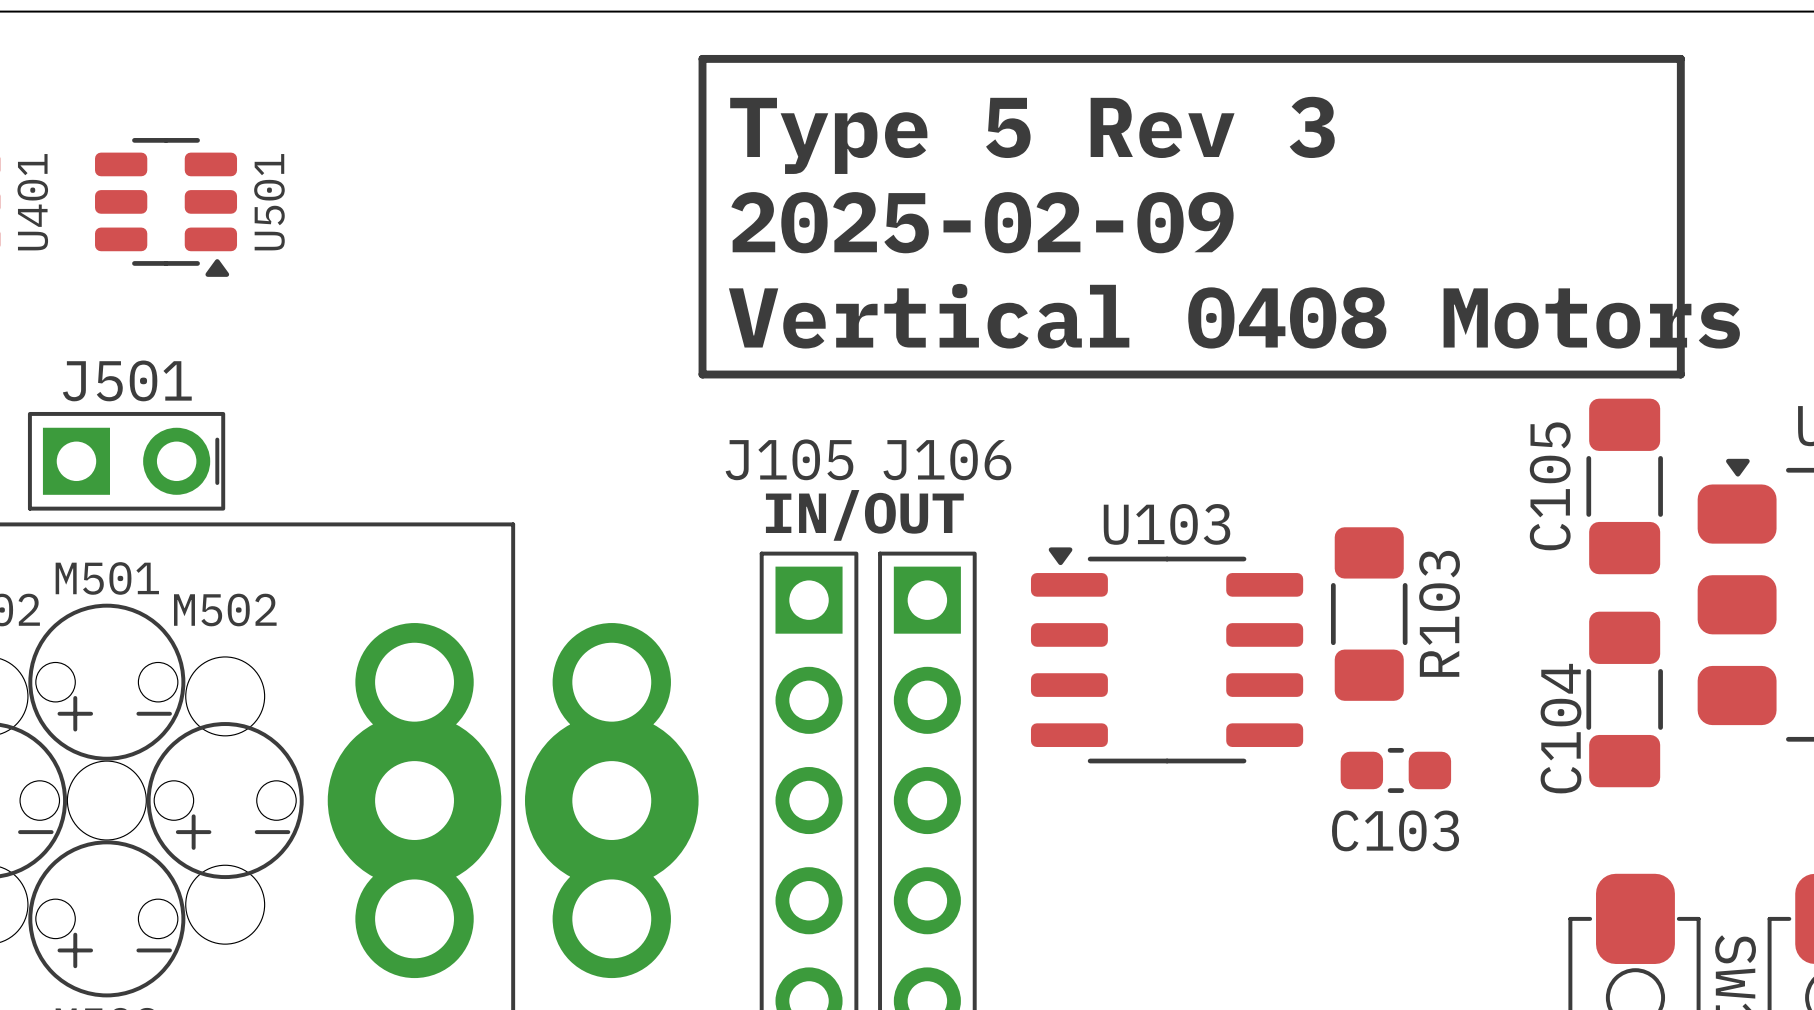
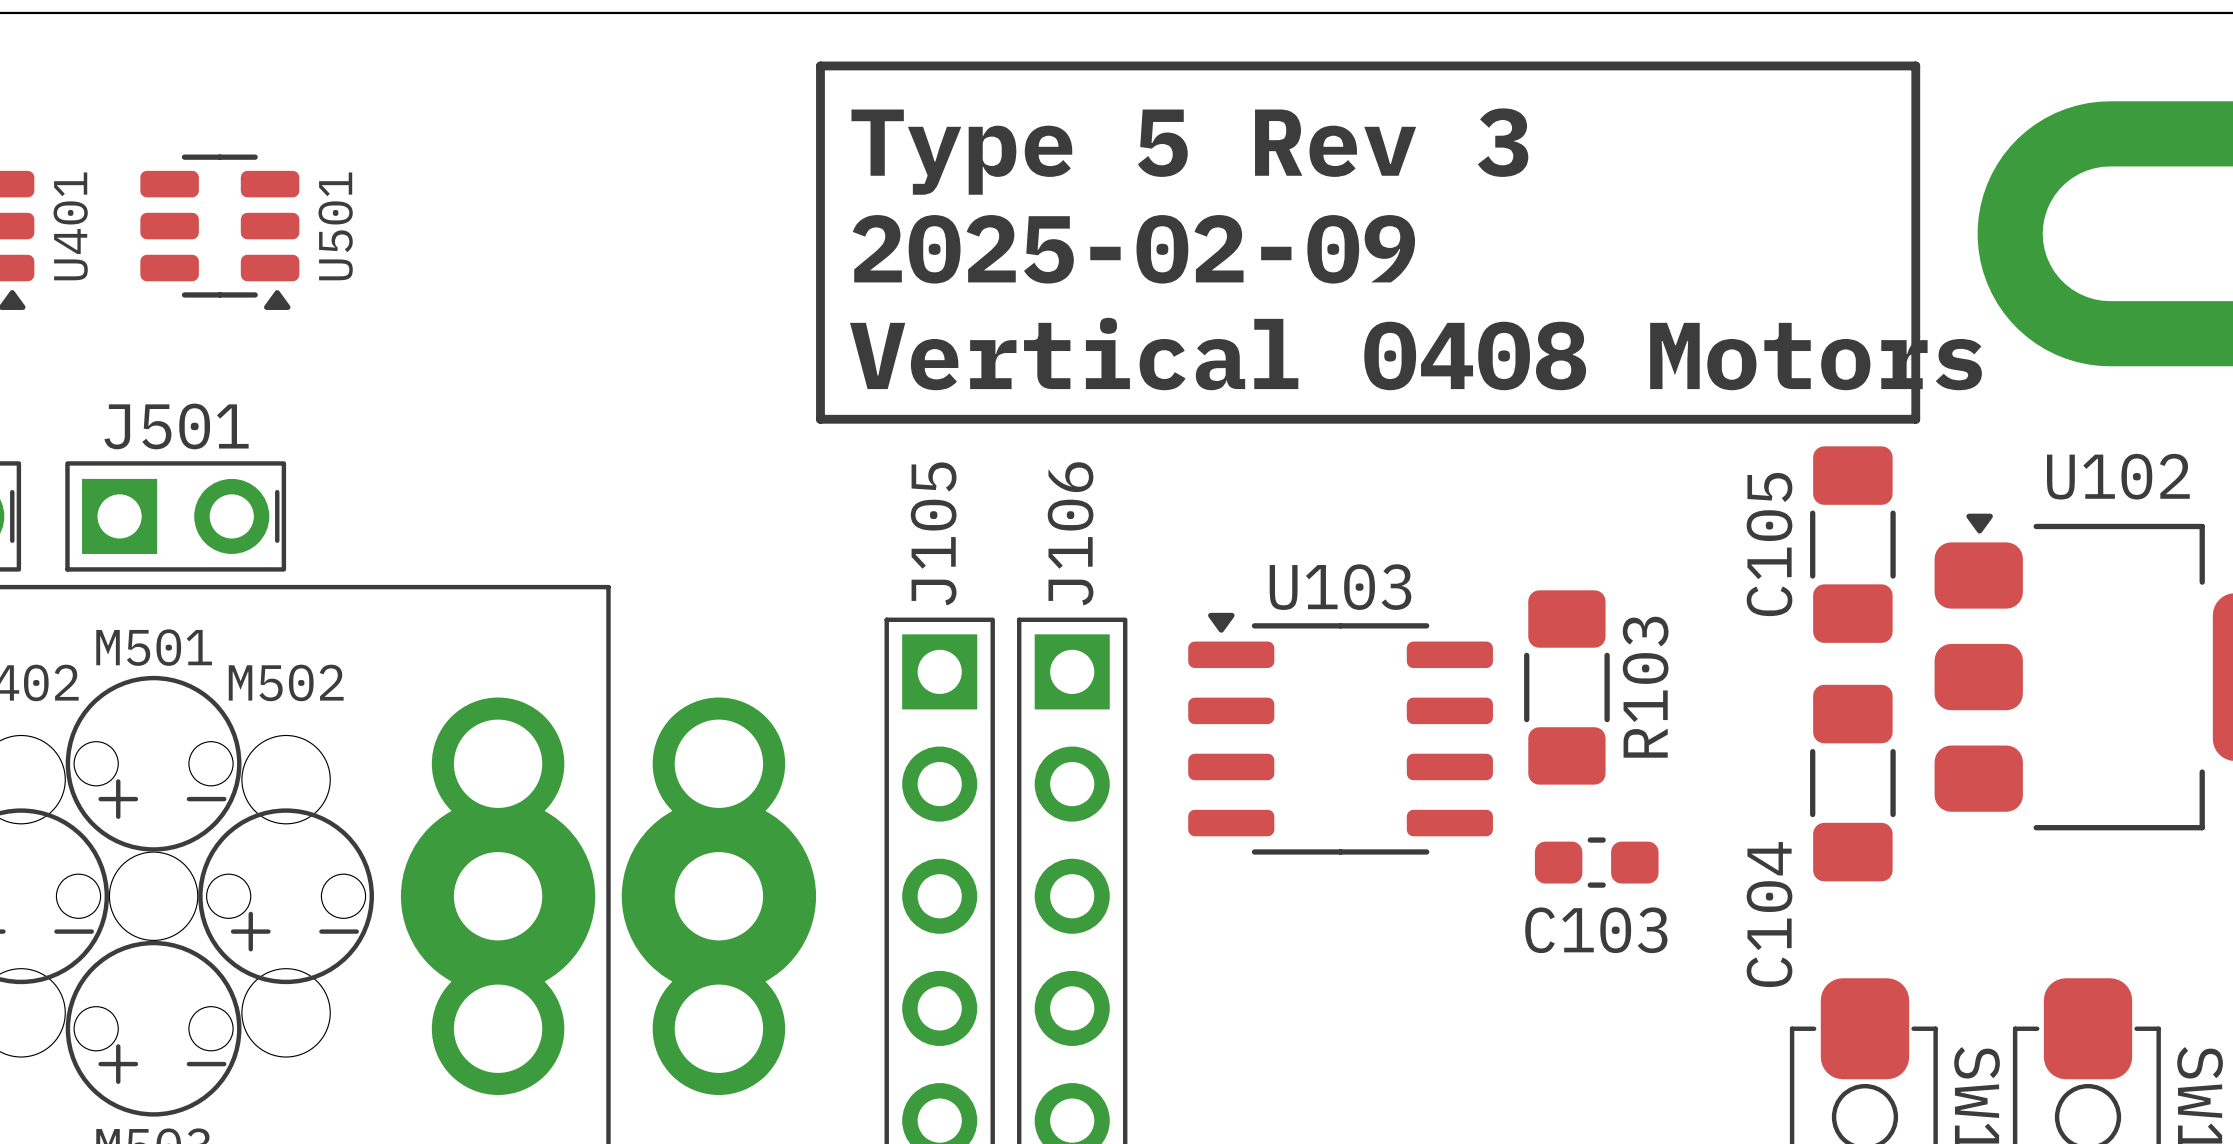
J105 name rotation: 0° (789, 459) -> 90° counterclockwise (933, 533)
J106 name rotation: 0° (947, 459) -> 90° counterclockwise (1070, 533)
text: IN/OUT (864, 515) -> none
C104 name position: C104 (1561, 728) -> C104 (1769, 914)

